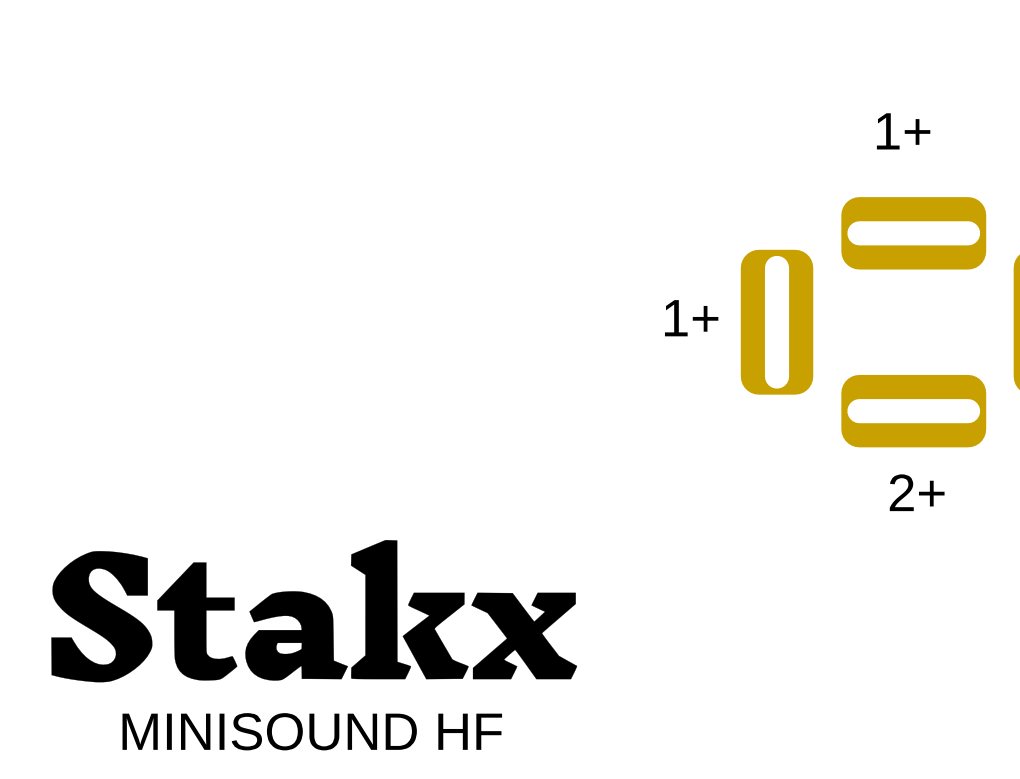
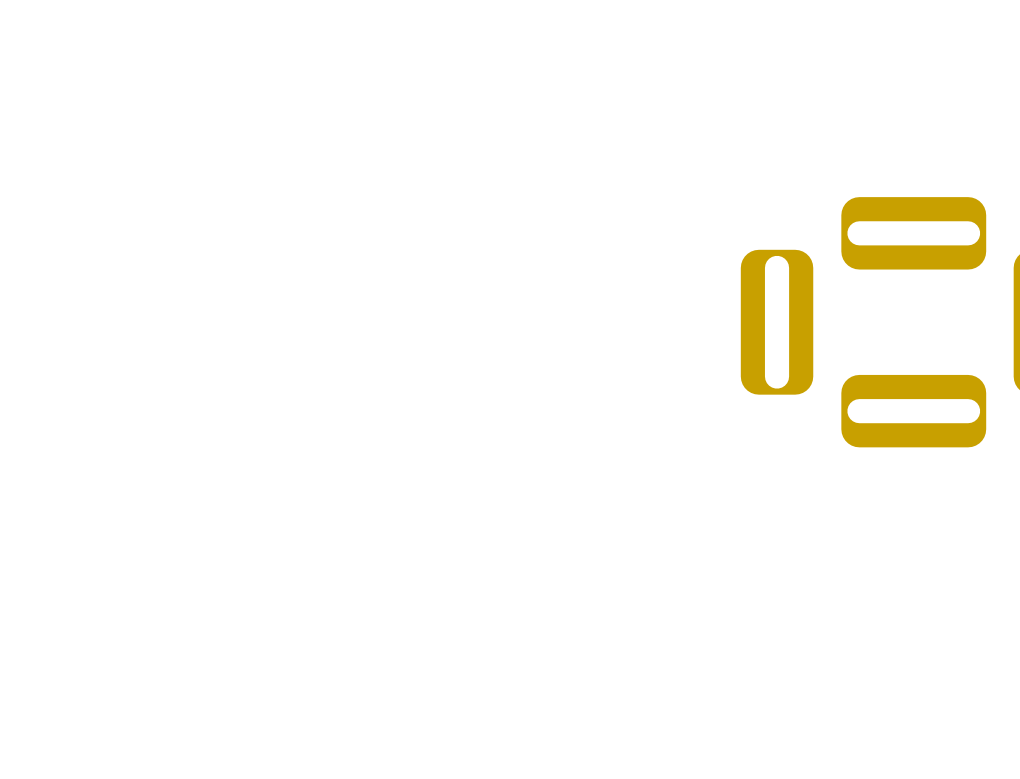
text: 1+ (903, 131) -> none
text: 1+ (691, 318) -> none
text: 2+ (917, 492) -> none
drawing: [51, 540, 578, 683] -> none
text: MINISOUND HF (312, 731) -> none

